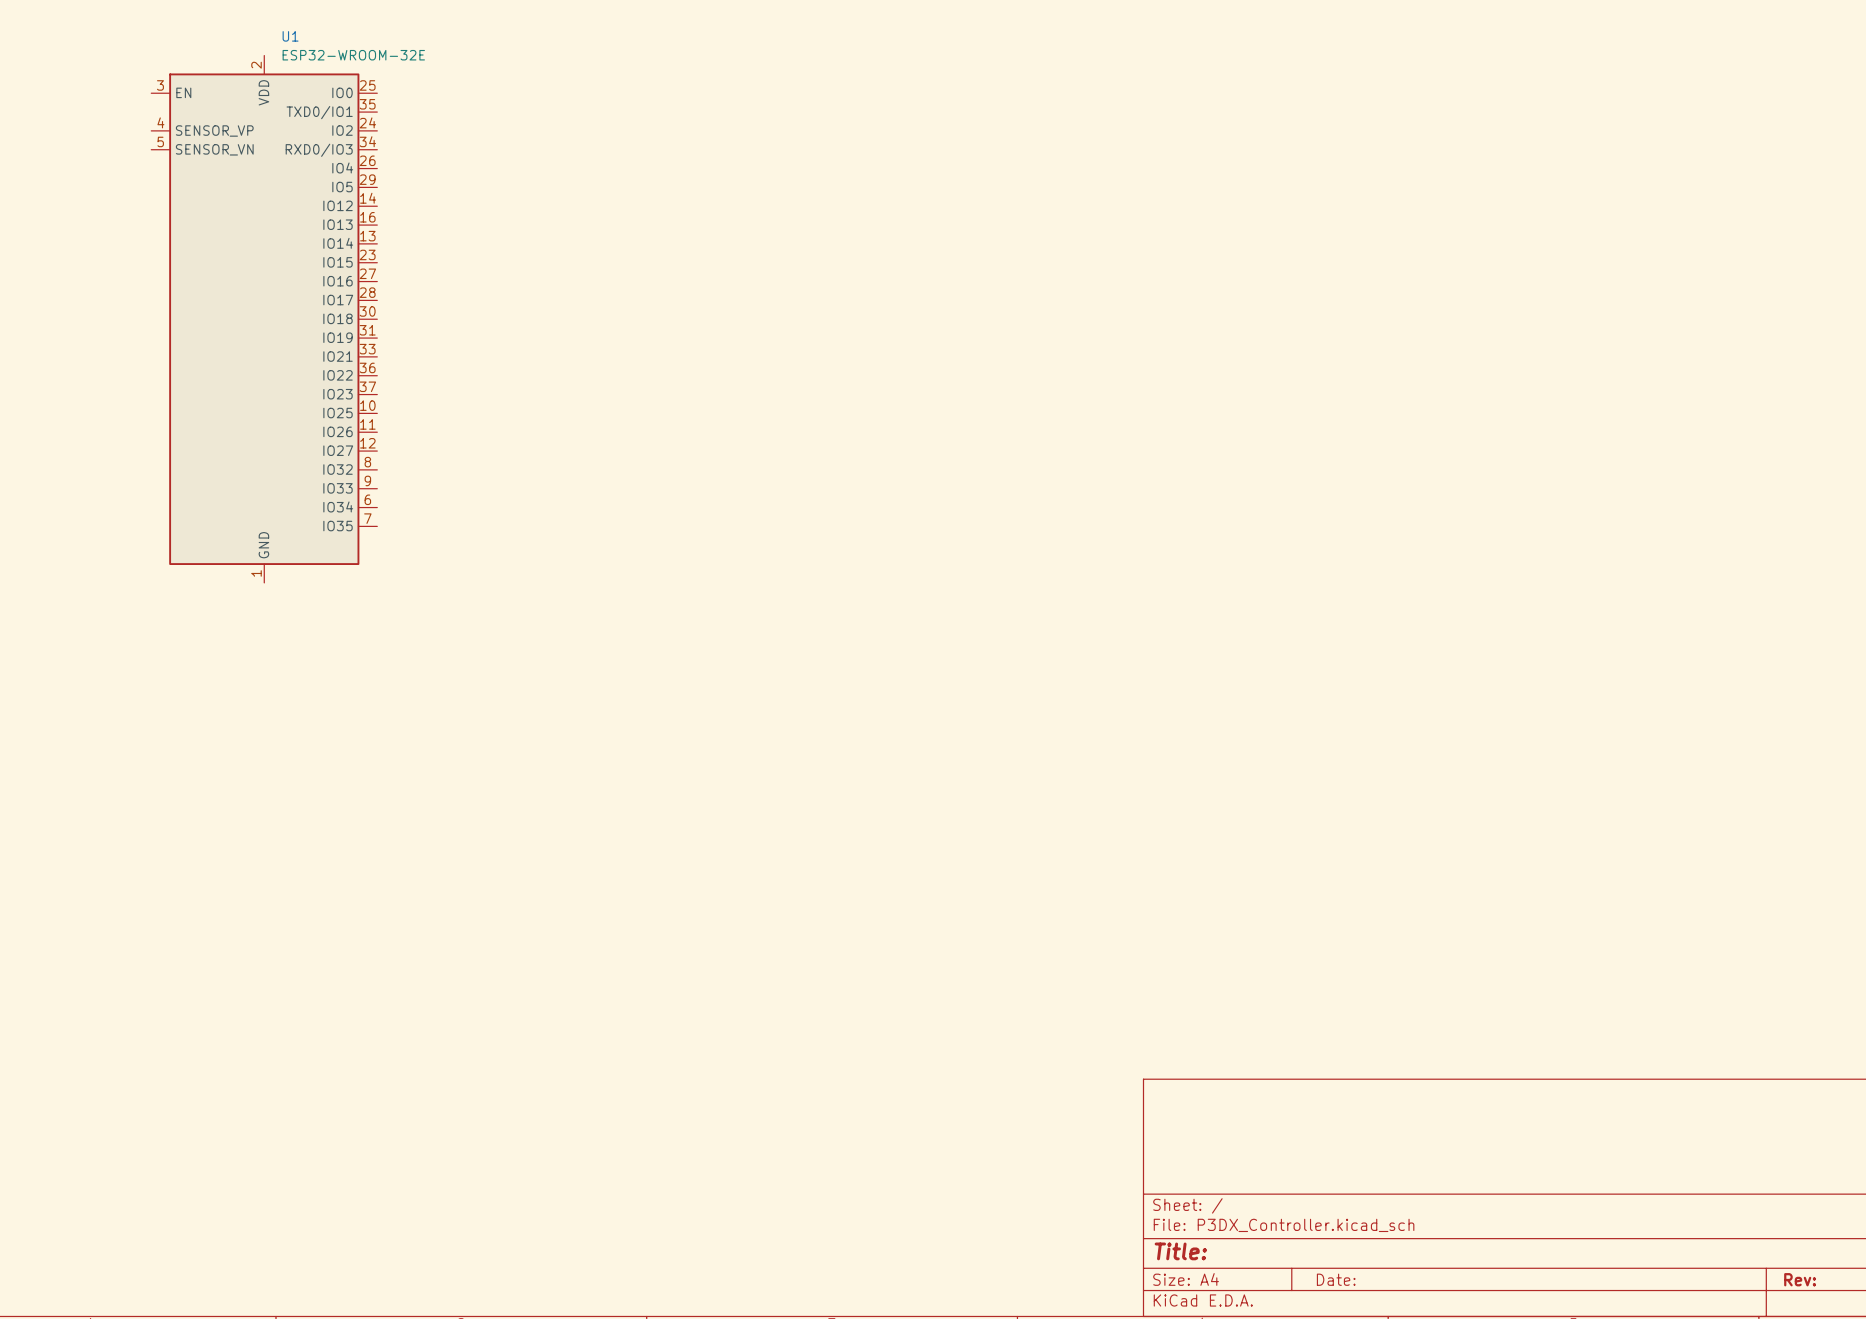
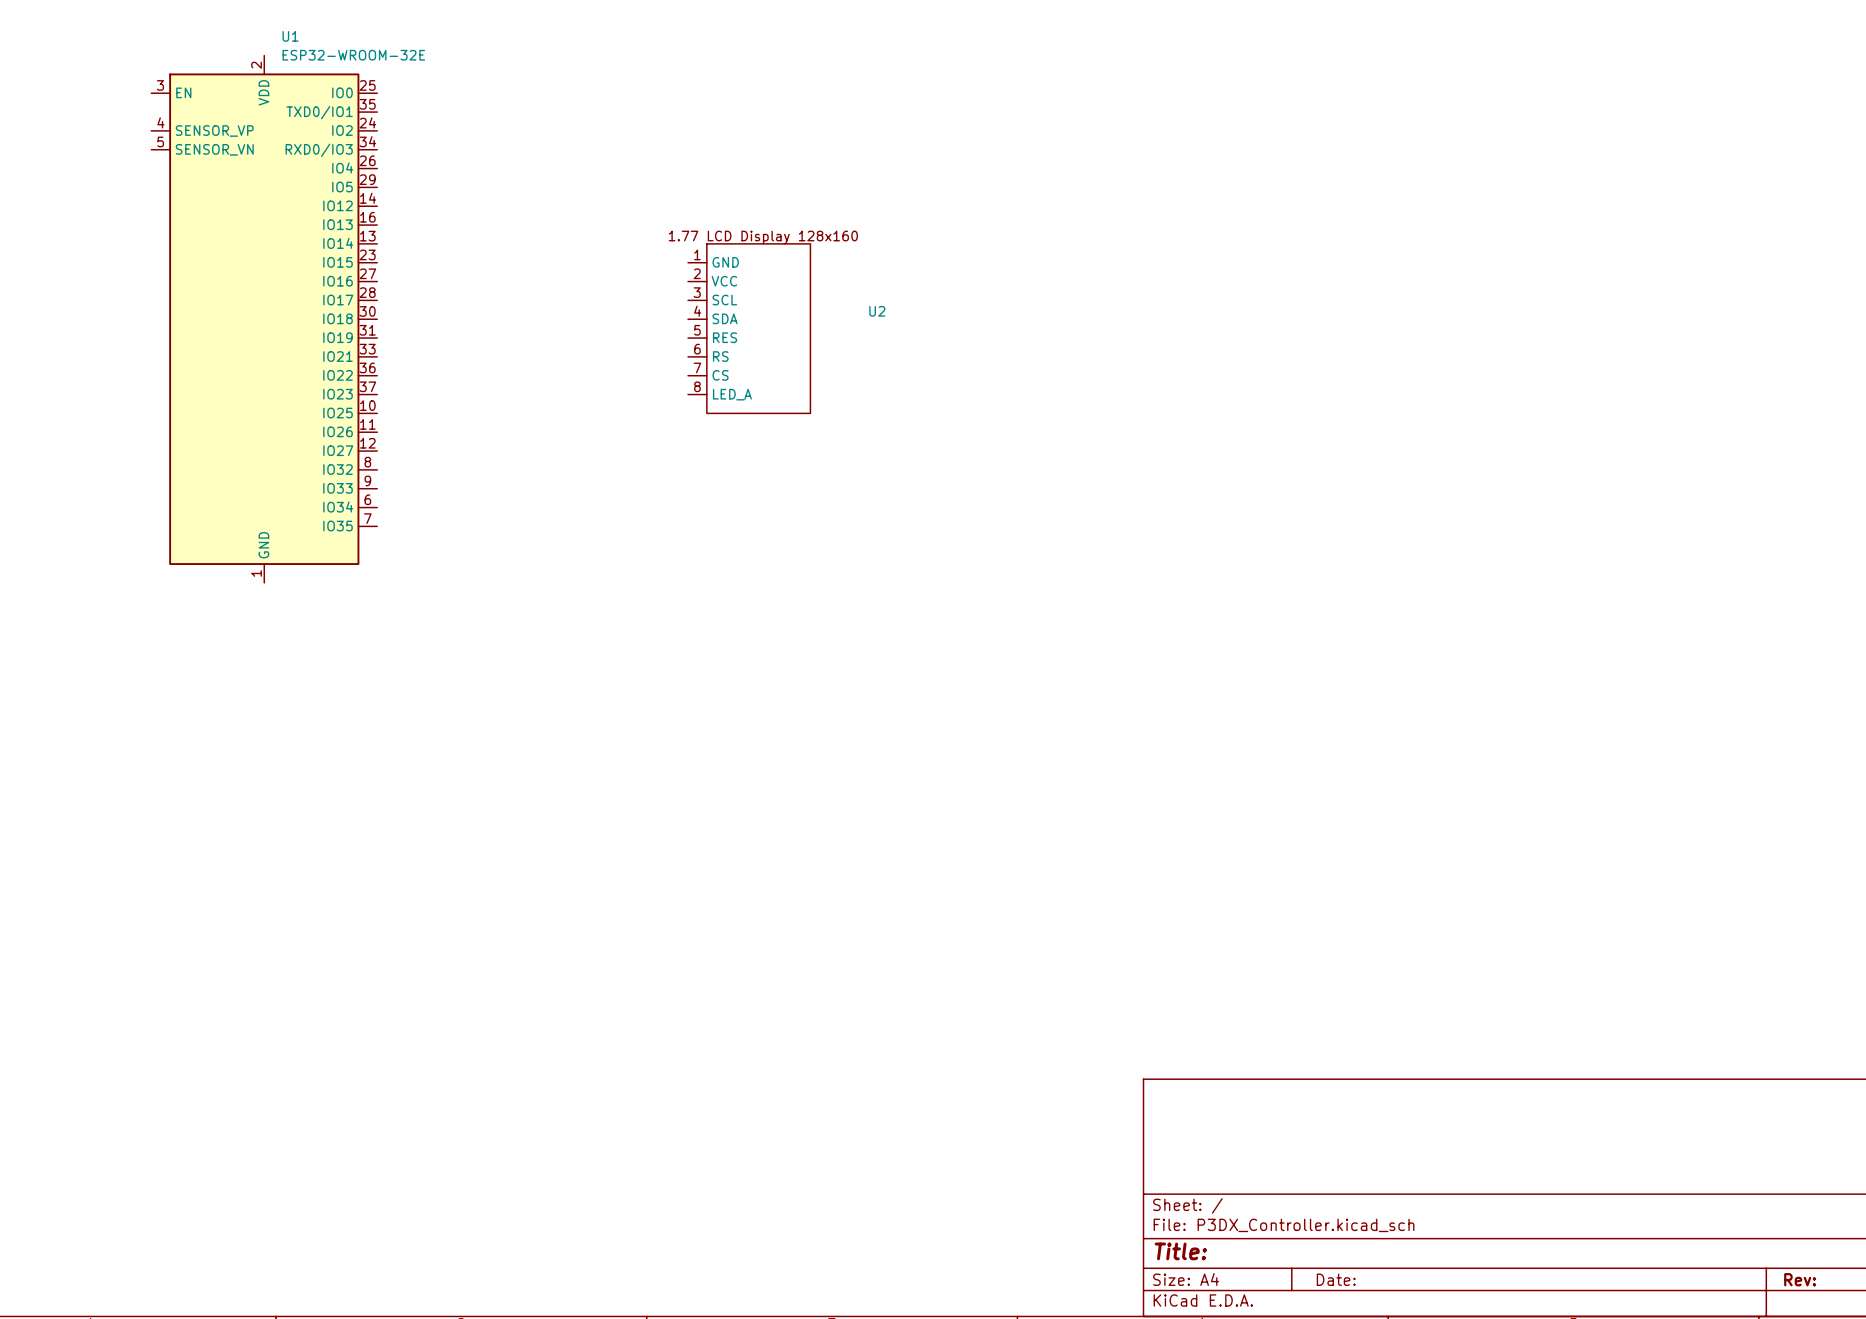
U2: none -> (749, 328)

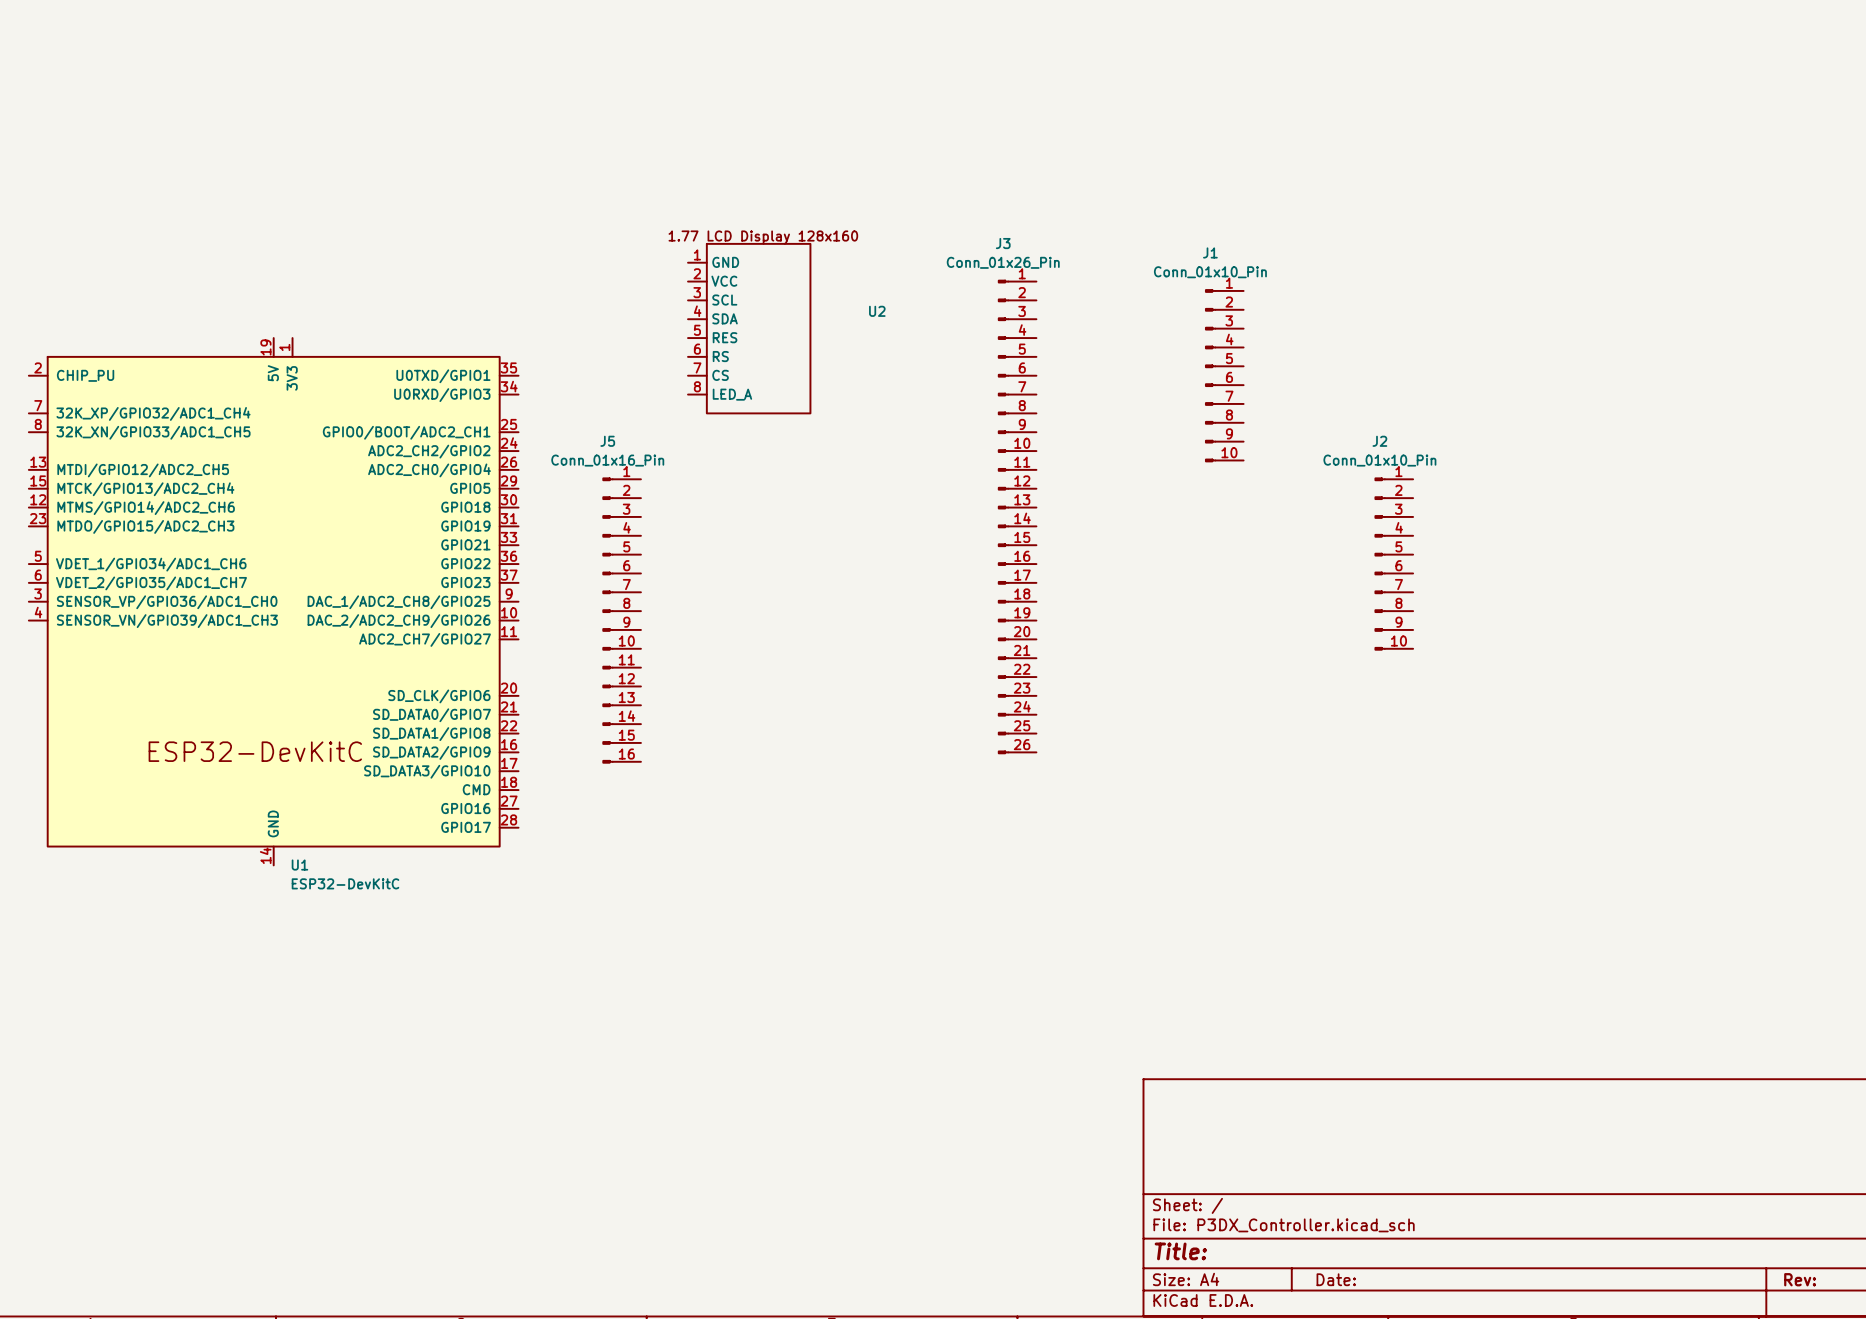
U1 name position: U1 (290, 36) -> U1 (299, 865)
U1 symbol: [151, 55, 378, 583] -> [28, 338, 519, 866]
U1 value: ESP32-WROOM-32E (353, 55) -> ESP32-DevKitC (345, 883)
J1: none -> Conn_01x10_Pin (1224, 375)
J3: none -> Conn_01x26_Pin (1017, 516)
J2: none -> Conn_01x10_Pin (1393, 564)
J5: none -> Conn_01x16_Pin (621, 620)

